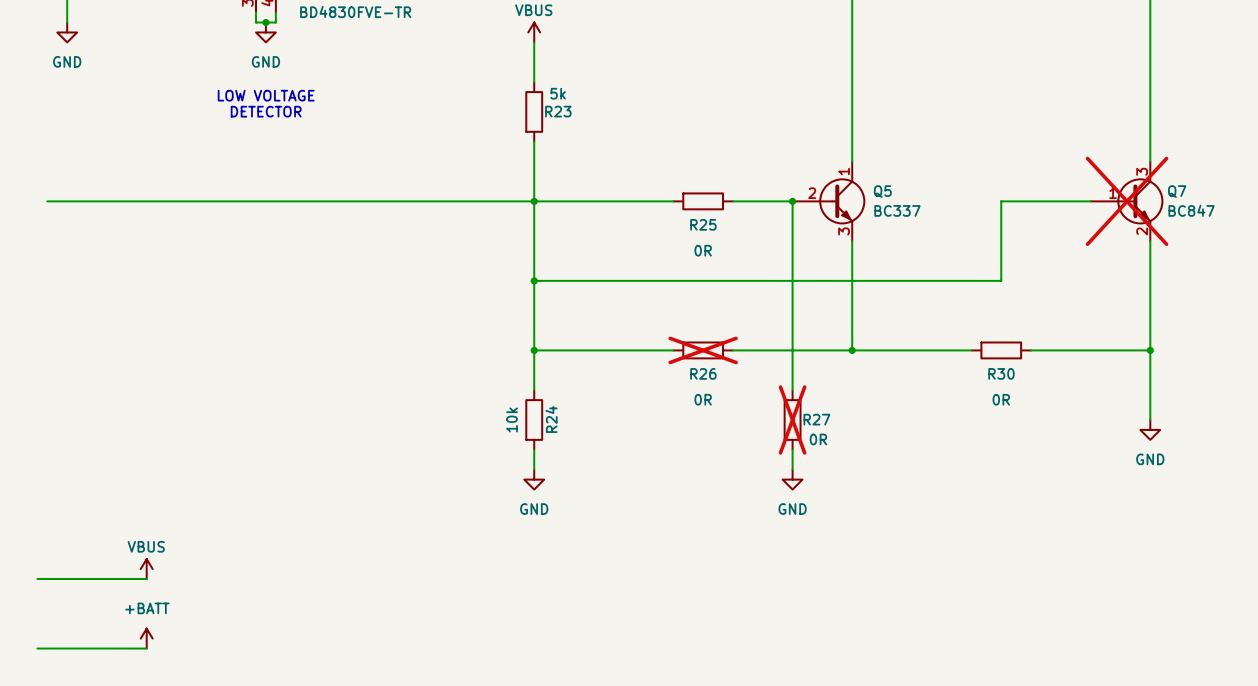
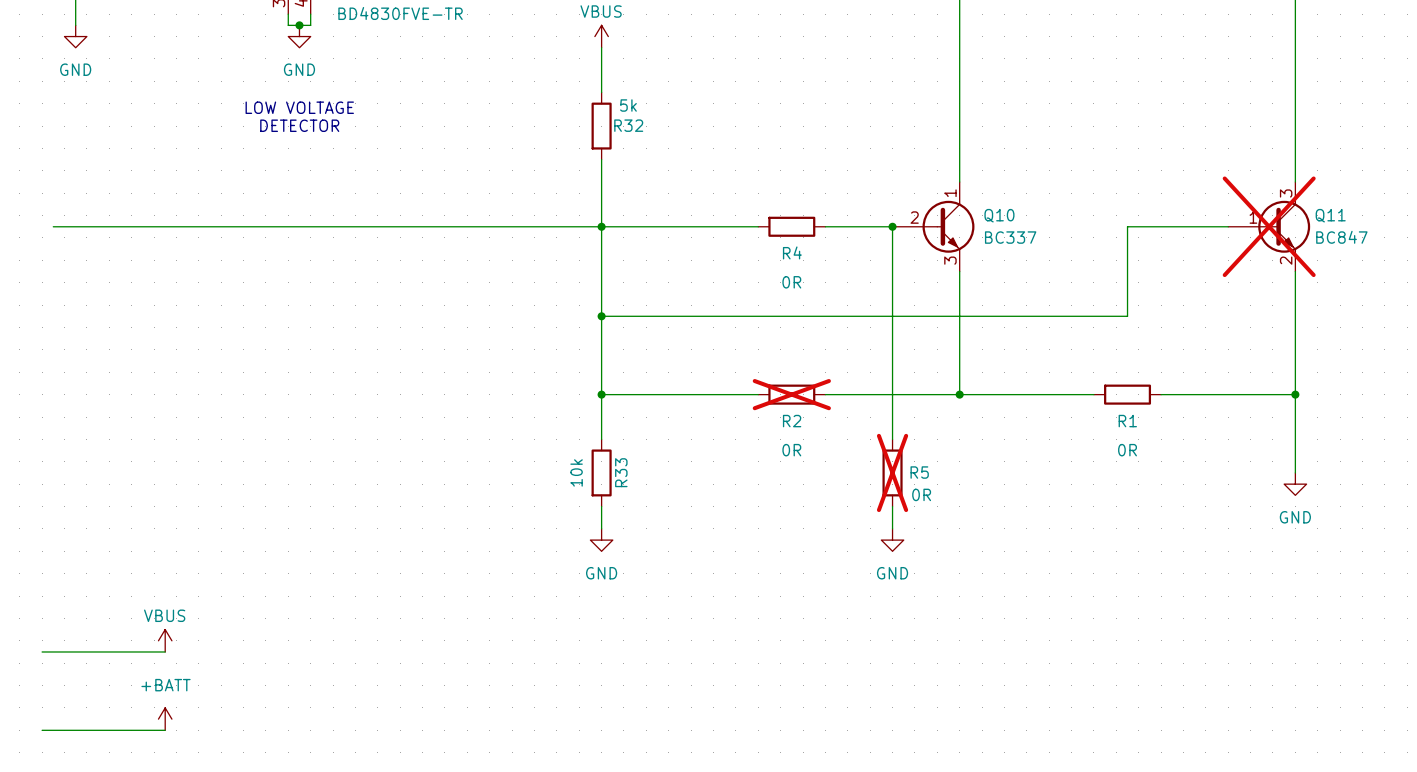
R23 name: R23 (558, 111) -> R32 (628, 125)
Q5 name: Q5 (882, 191) -> Q10 (999, 215)
Q7 name: Q7 (1177, 191) -> Q11 (1330, 215)
R25 name: R25 (703, 224) -> R4 (792, 252)
R26 name: R26 (703, 373) -> R2 (792, 421)
R30 name: R30 (1001, 373) -> R1 (1127, 421)
R24 name: R24 (551, 419) -> R33 (621, 472)
R27 name: R27 (816, 419) -> R5 (919, 472)

